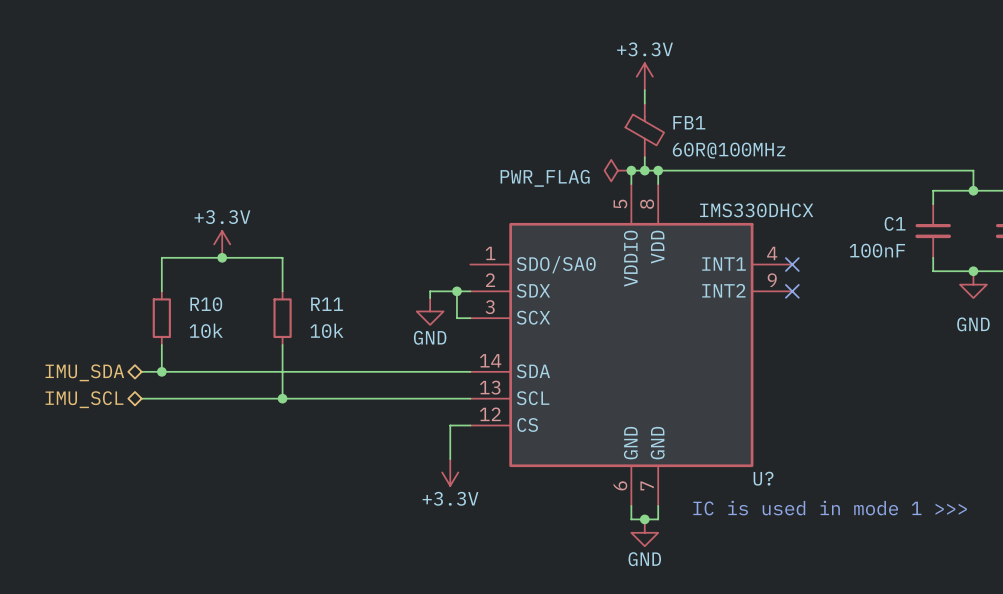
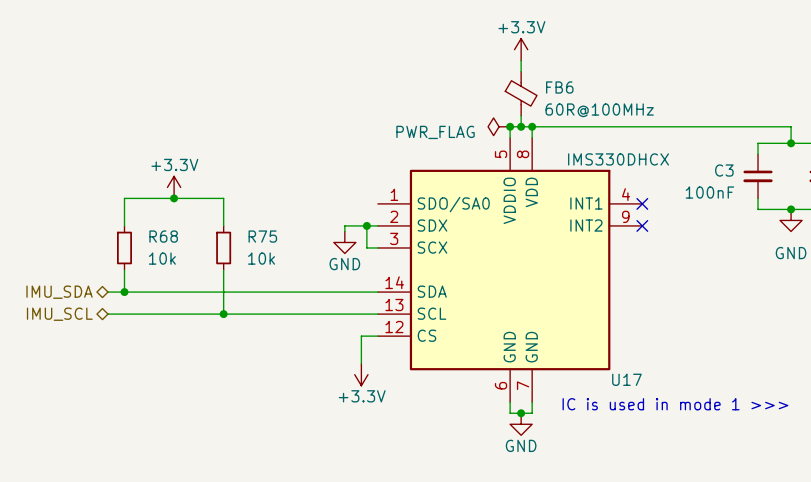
FB1 name: FB1 (689, 122) -> FB6 (559, 87)
C1 name: C1 (895, 223) -> C3 (724, 170)
R10 name: R10 (206, 304) -> R68 (163, 236)
R11 name: R11 (327, 304) -> R75 (262, 236)
U? name: U? (763, 478) -> U17 (626, 379)

